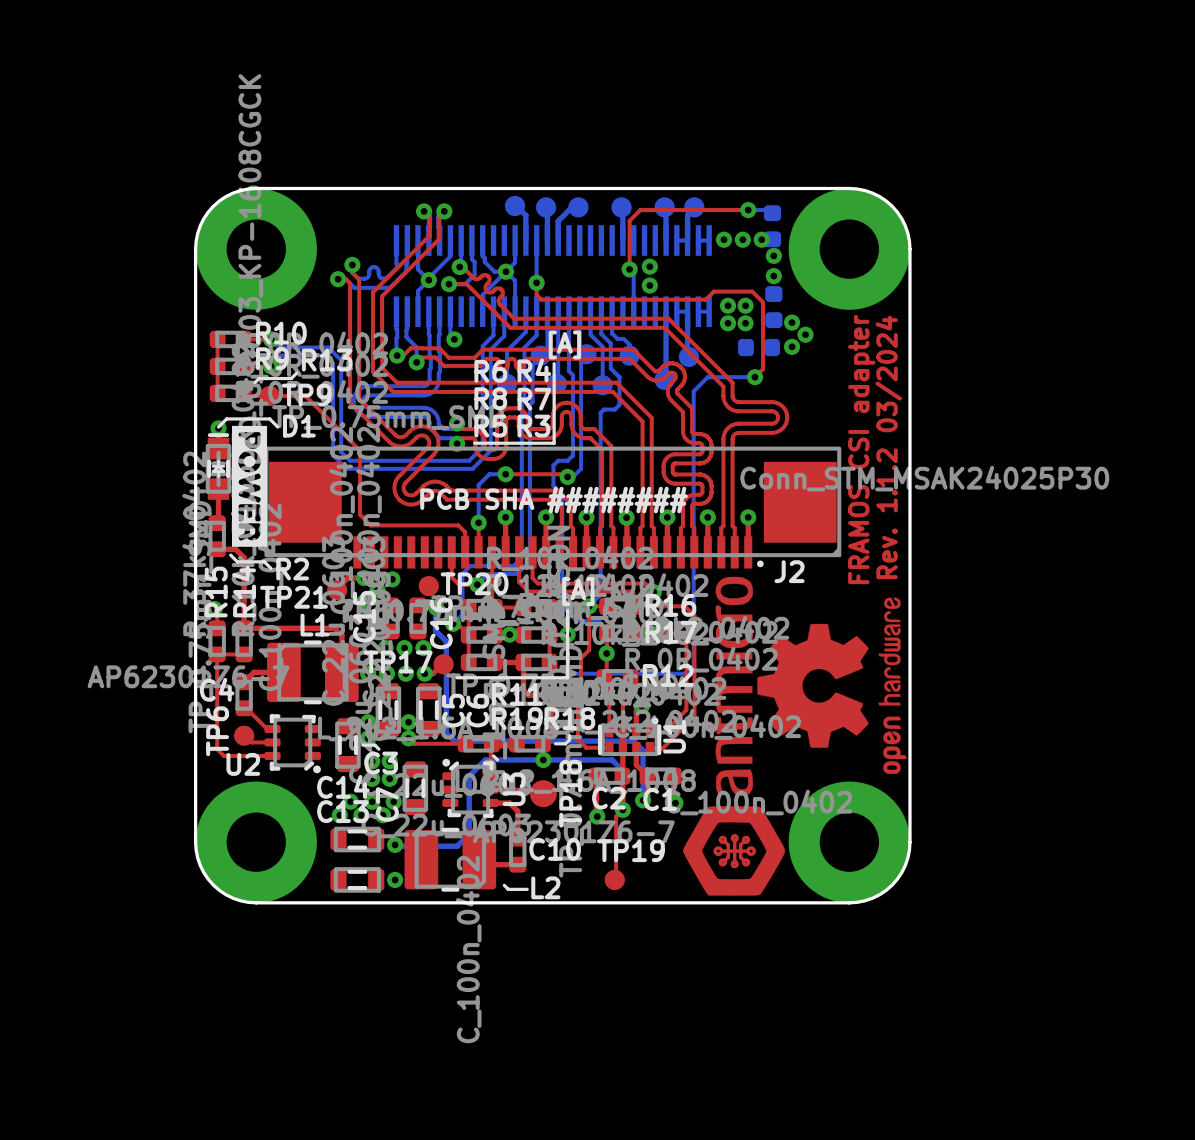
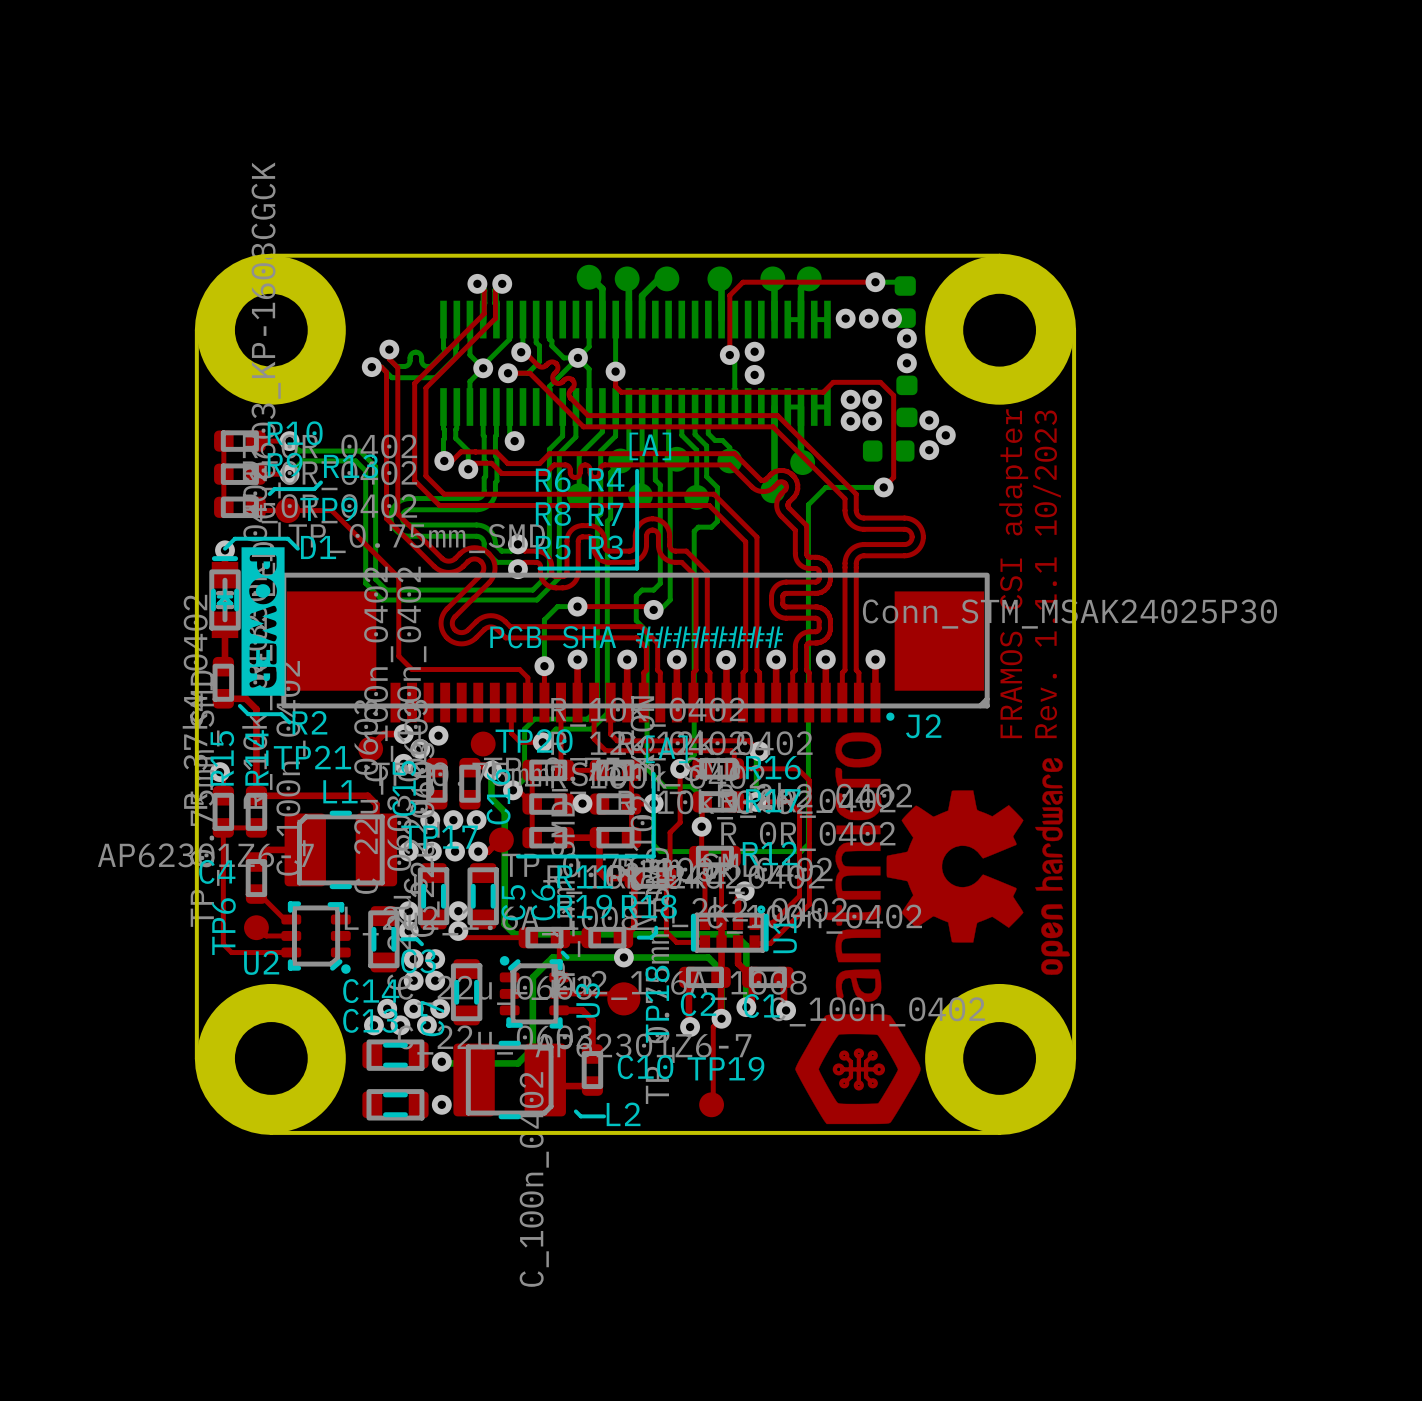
text: Rev. 1.1.2 03/2024 (888, 447) -> Rev. 1.1.1 10/2023 (1047, 574)

